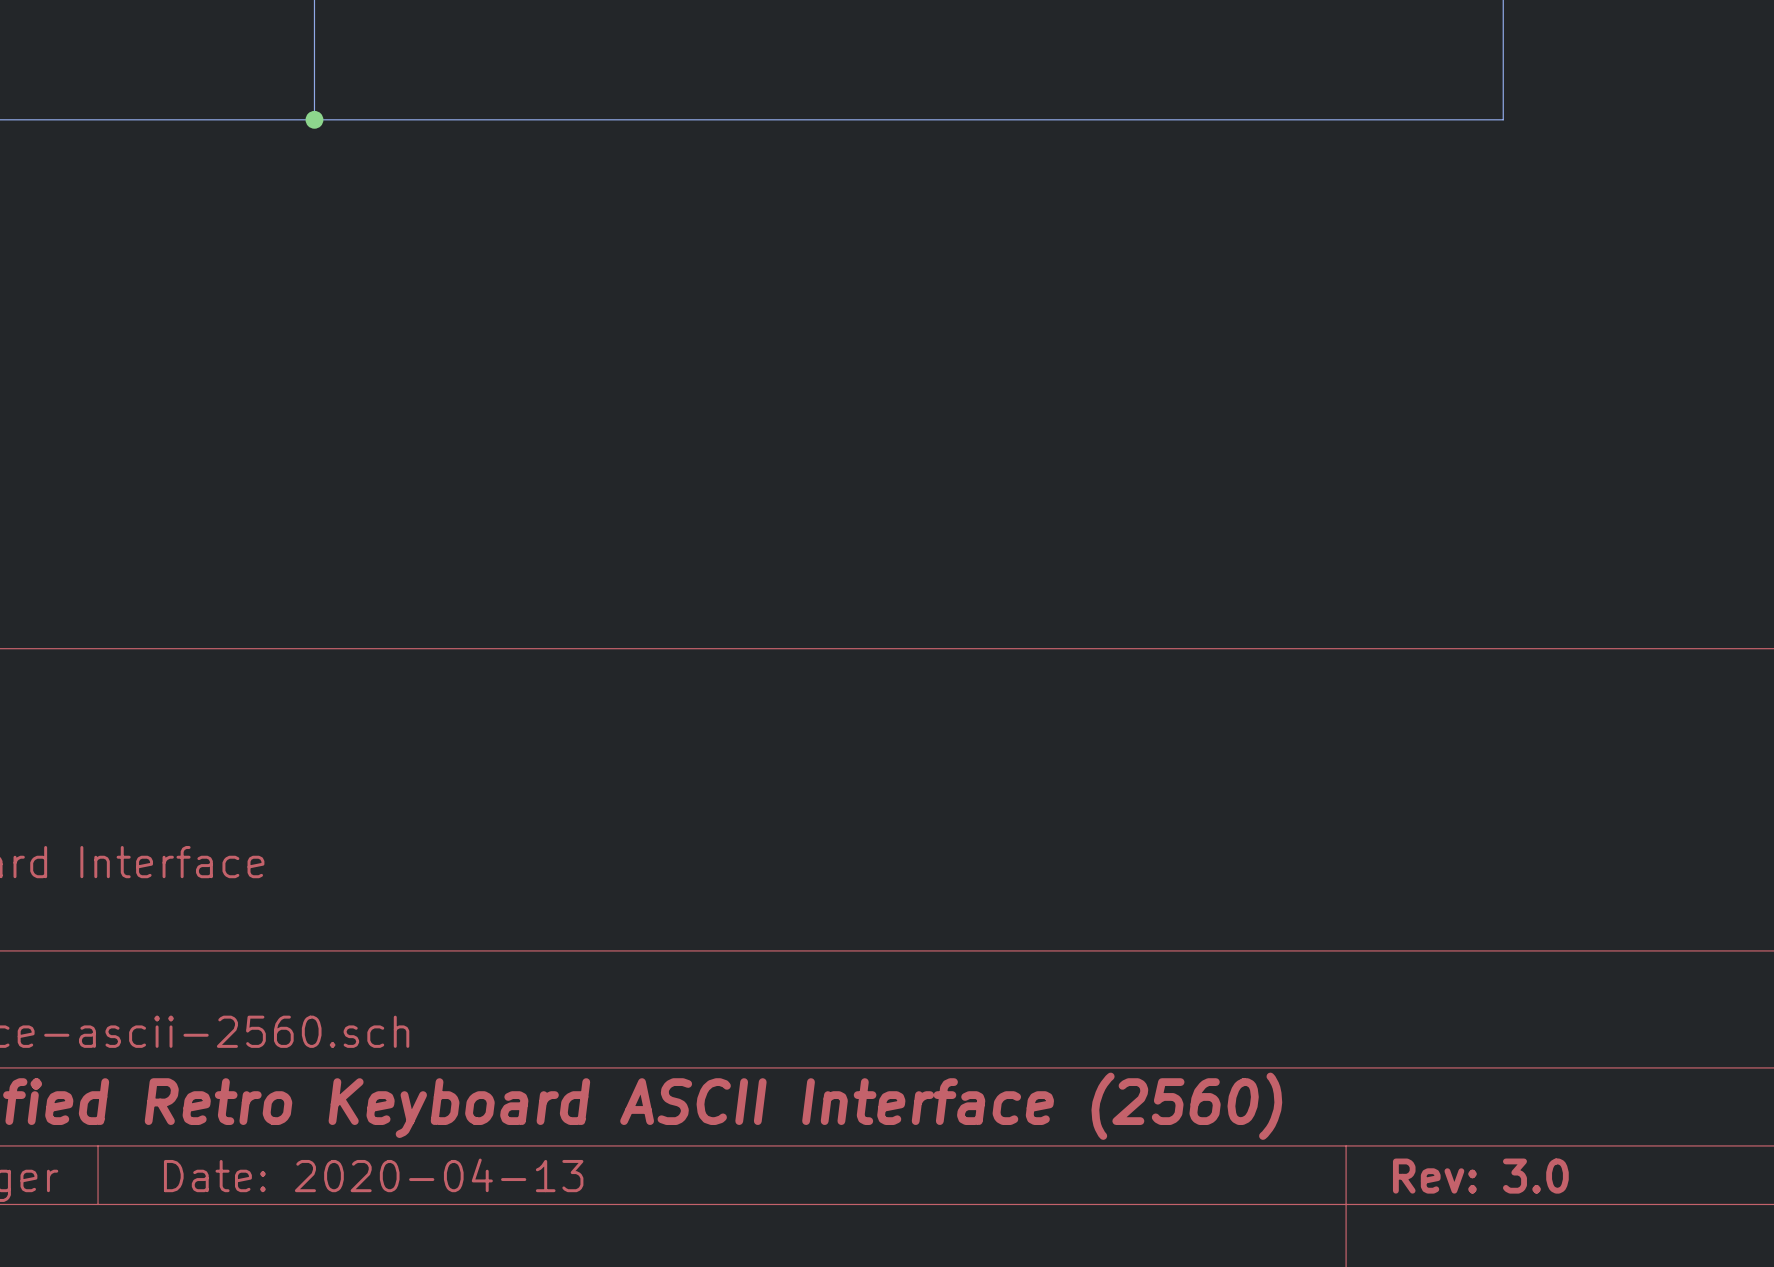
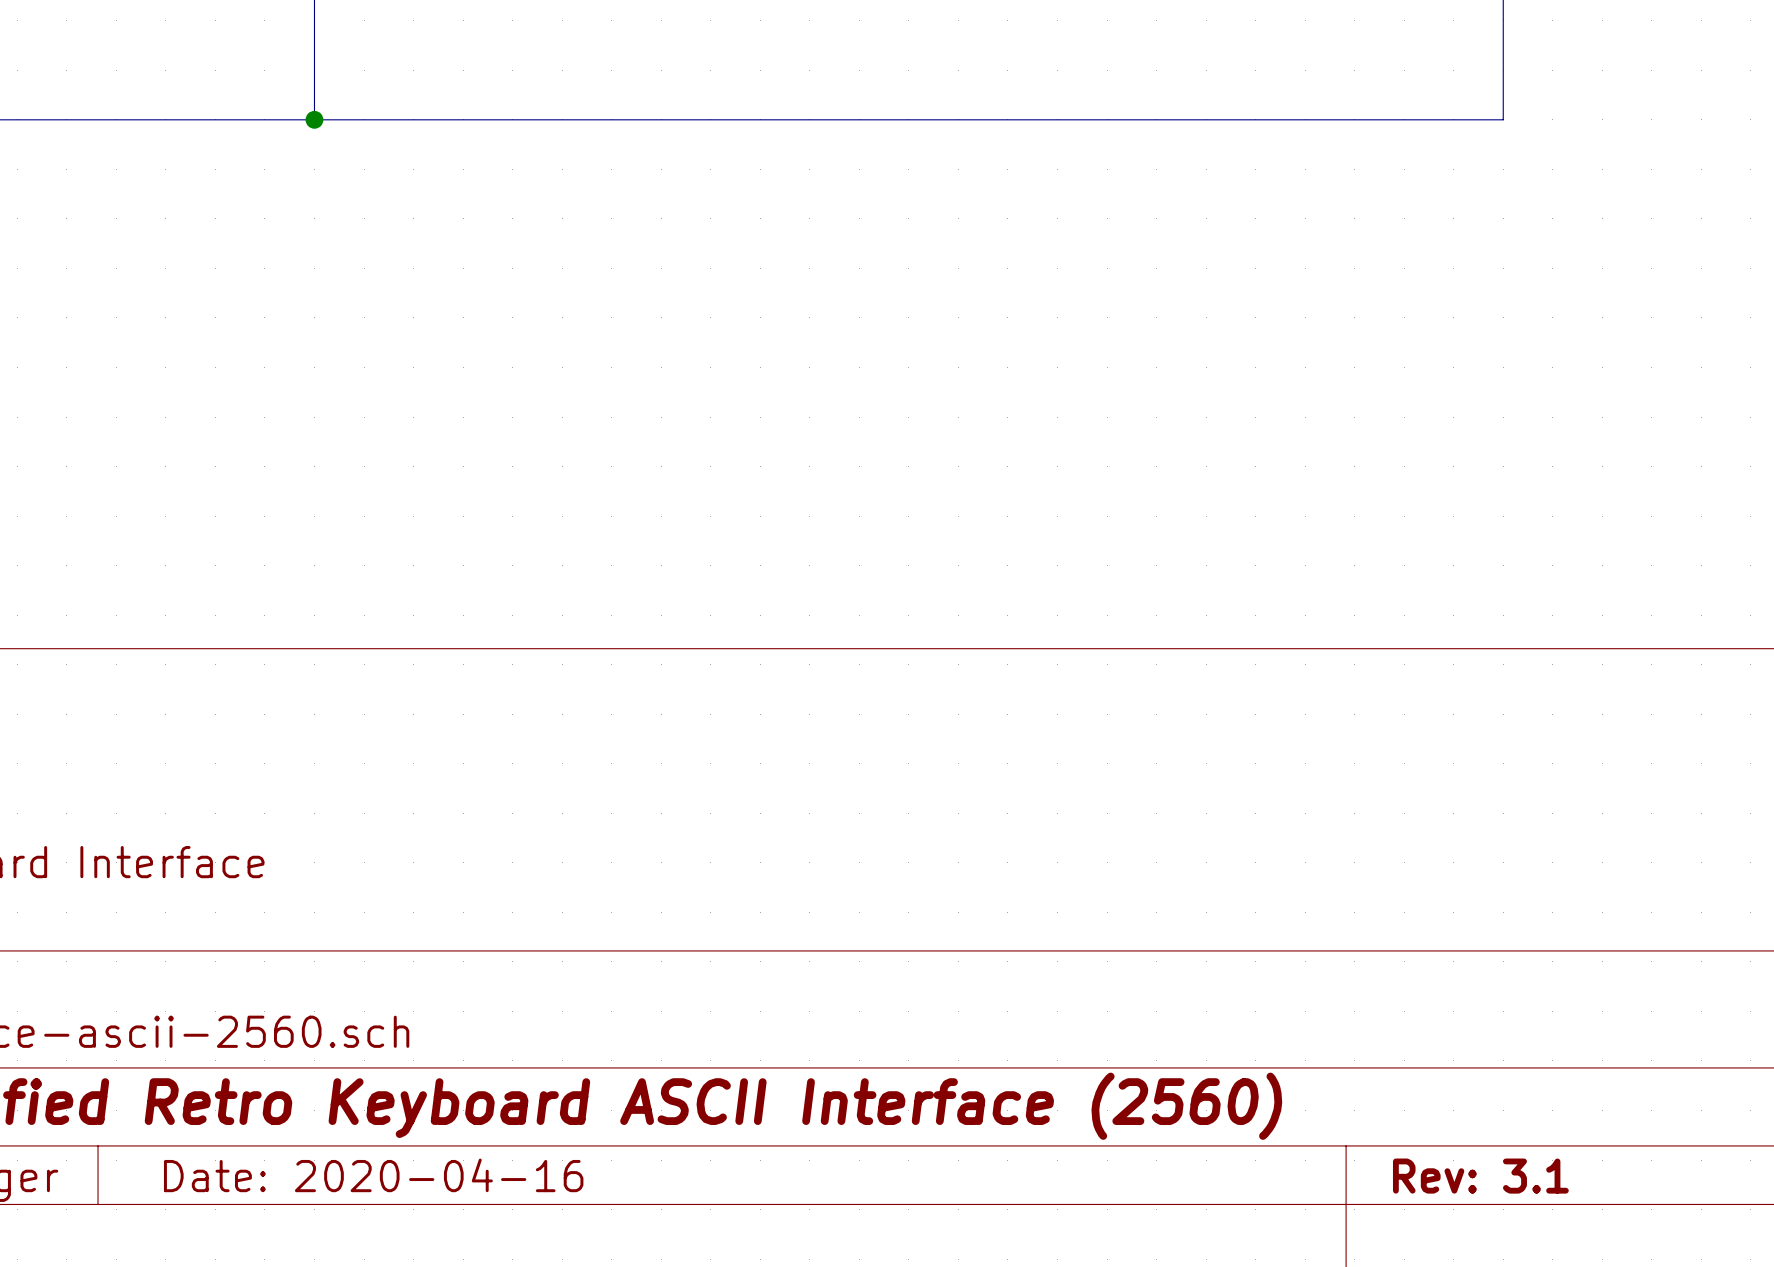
title block: Date: 2020-04-13 (373, 1175) -> Date: 2020-04-16 (373, 1175)
title block: Rev: 3.0 (1480, 1176) -> Rev: 3.1 (1480, 1176)

